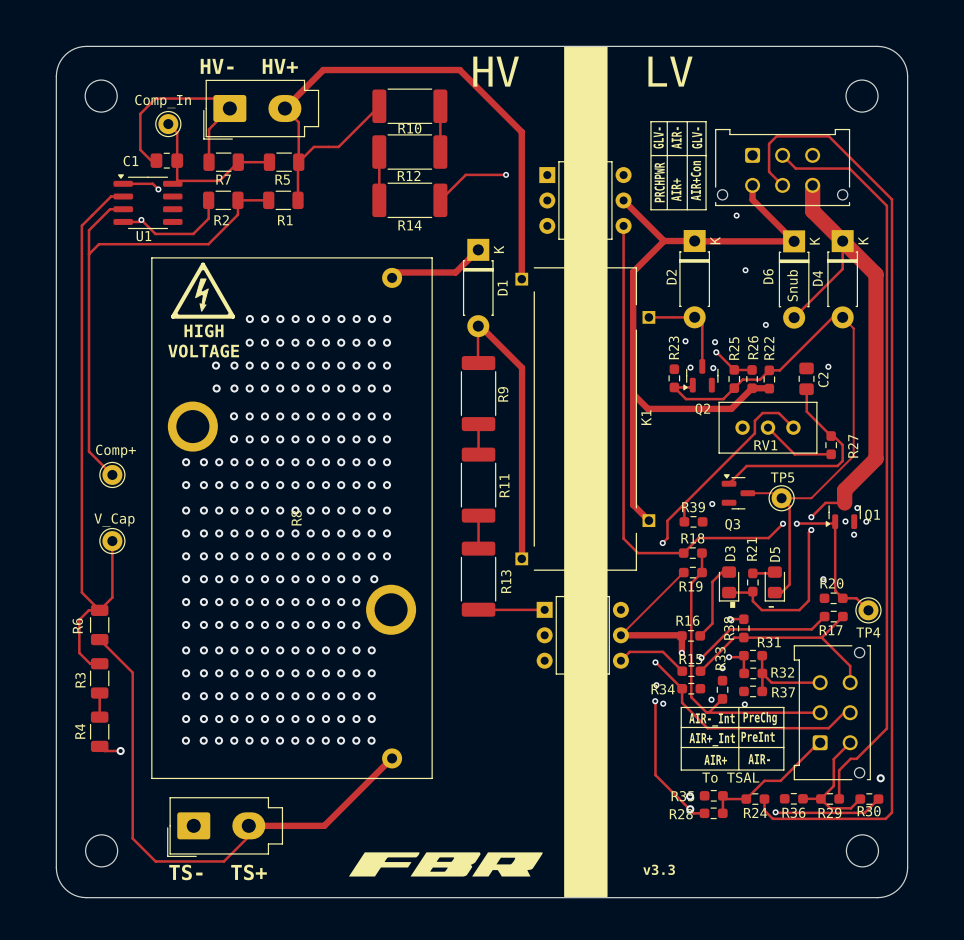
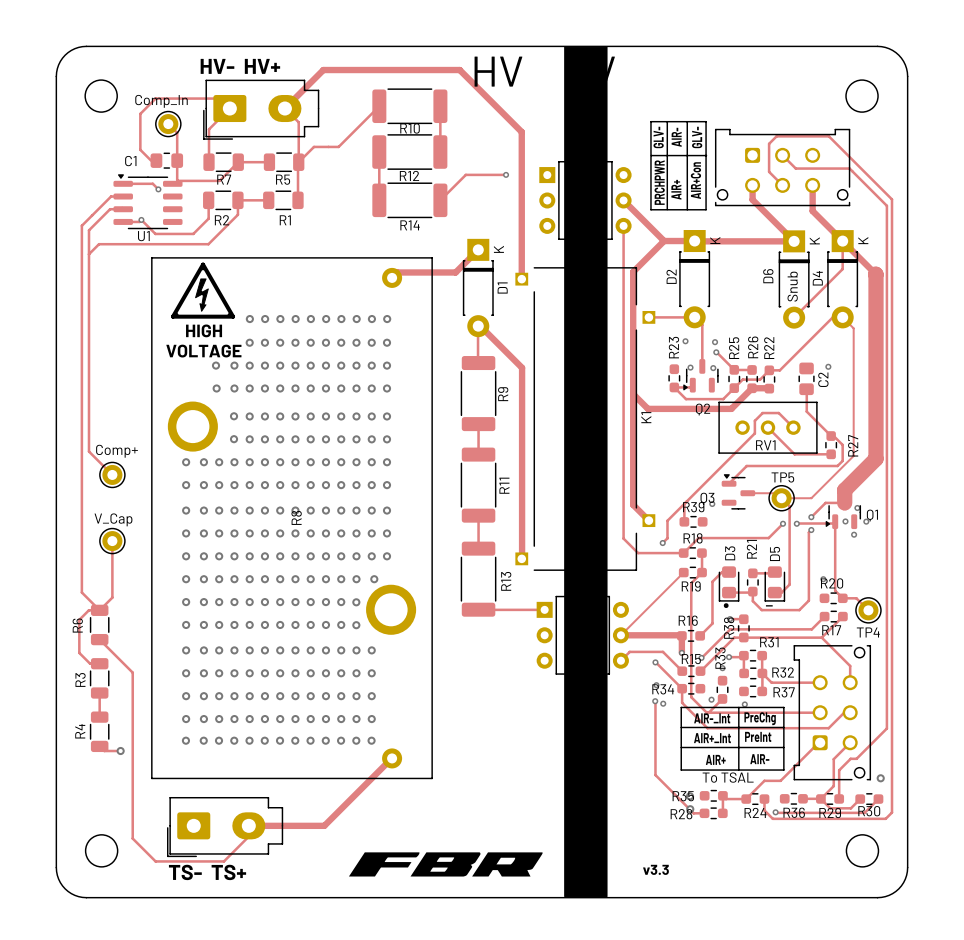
track width: thick (812, 185) (812, 211) (875, 274) -> thin (812, 185) (812, 211) (875, 274)
via: (736, 215) -> none
via: (745, 270) -> none
via: (765, 324) -> none
Q3 name position: Q3 (732, 524) -> Q3 (707, 498)

